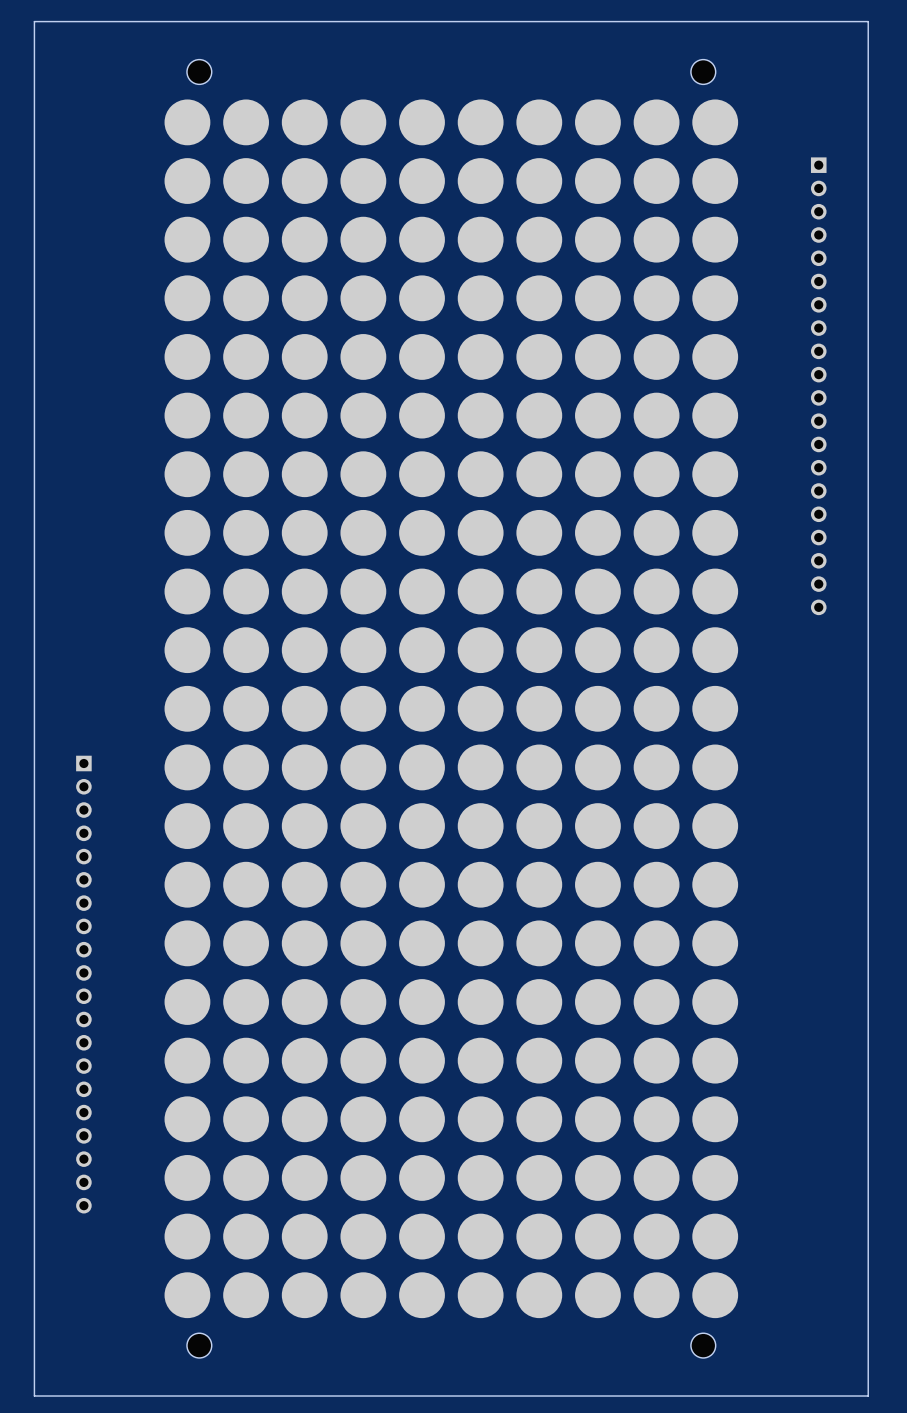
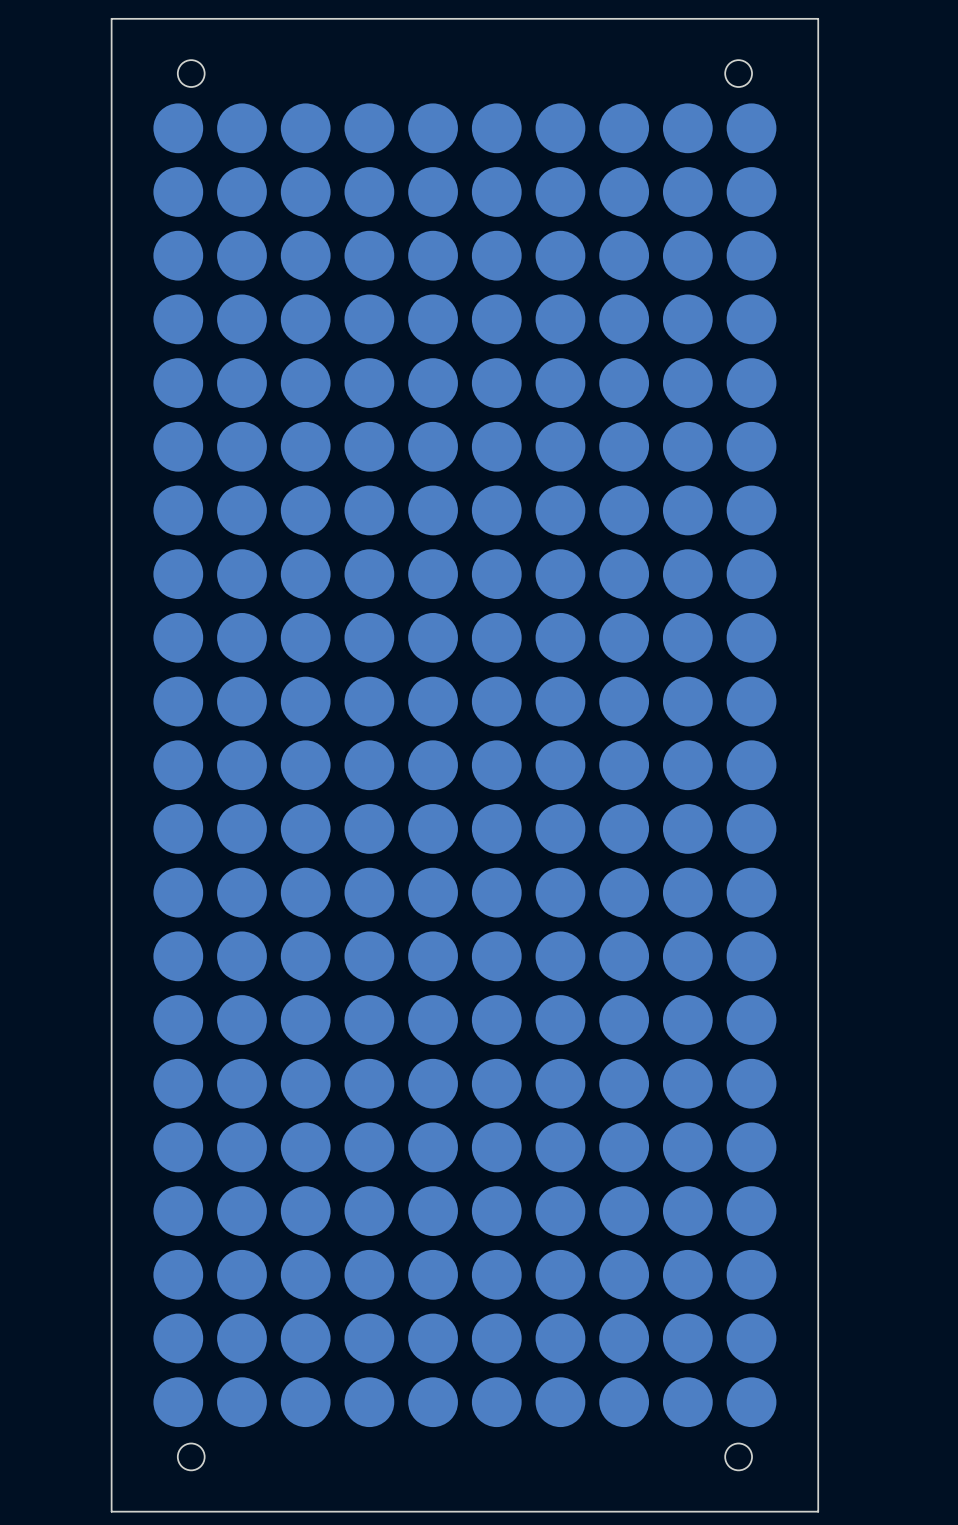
board edge: (126, 21) (34, 21) (34, 1396) (126, 1396) -> (111, 18) (111, 1511)
board edge: (776, 21) (868, 21) (868, 1396) (776, 1396) -> (818, 18) (818, 1511)
part: (818, 386) -> none
part: (83, 984) -> none

